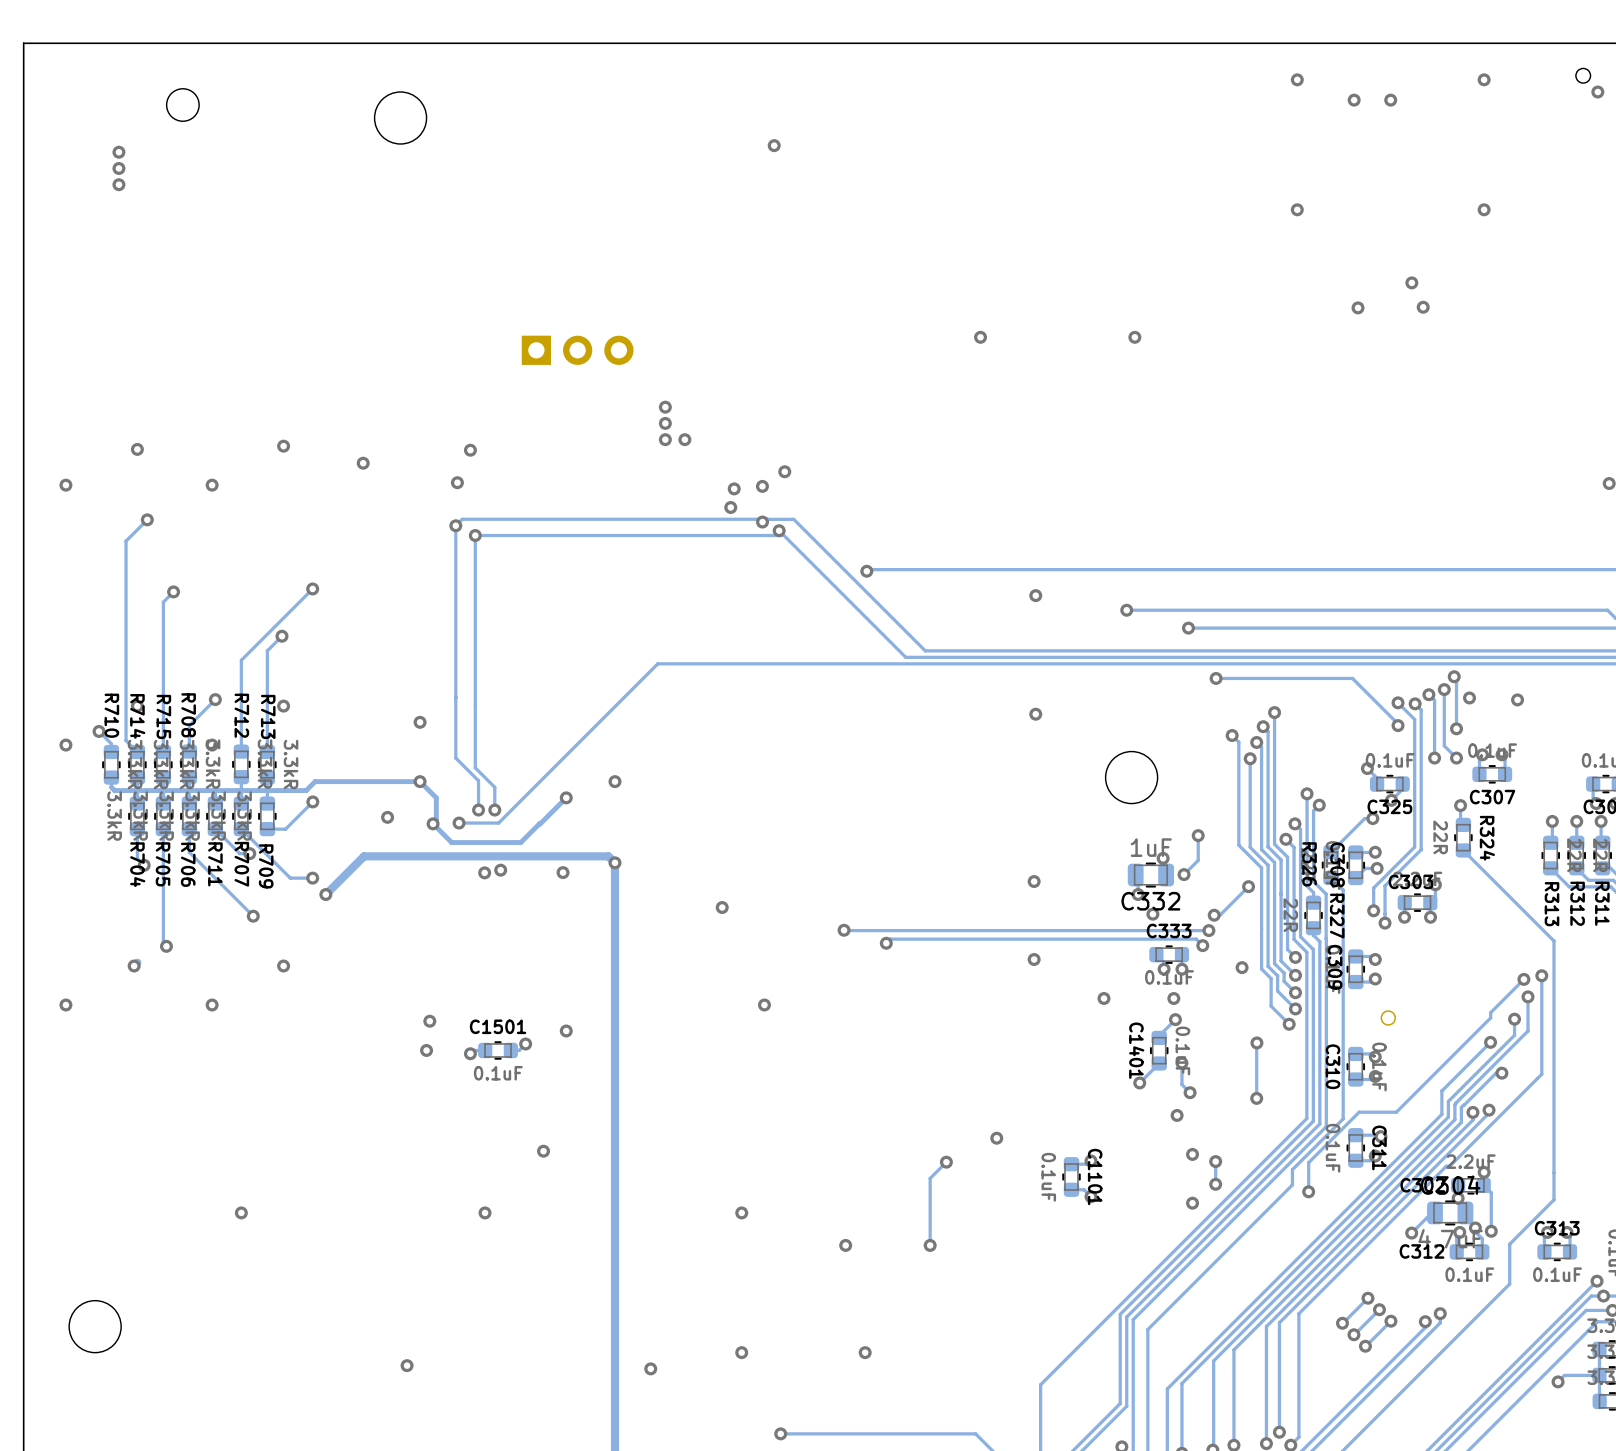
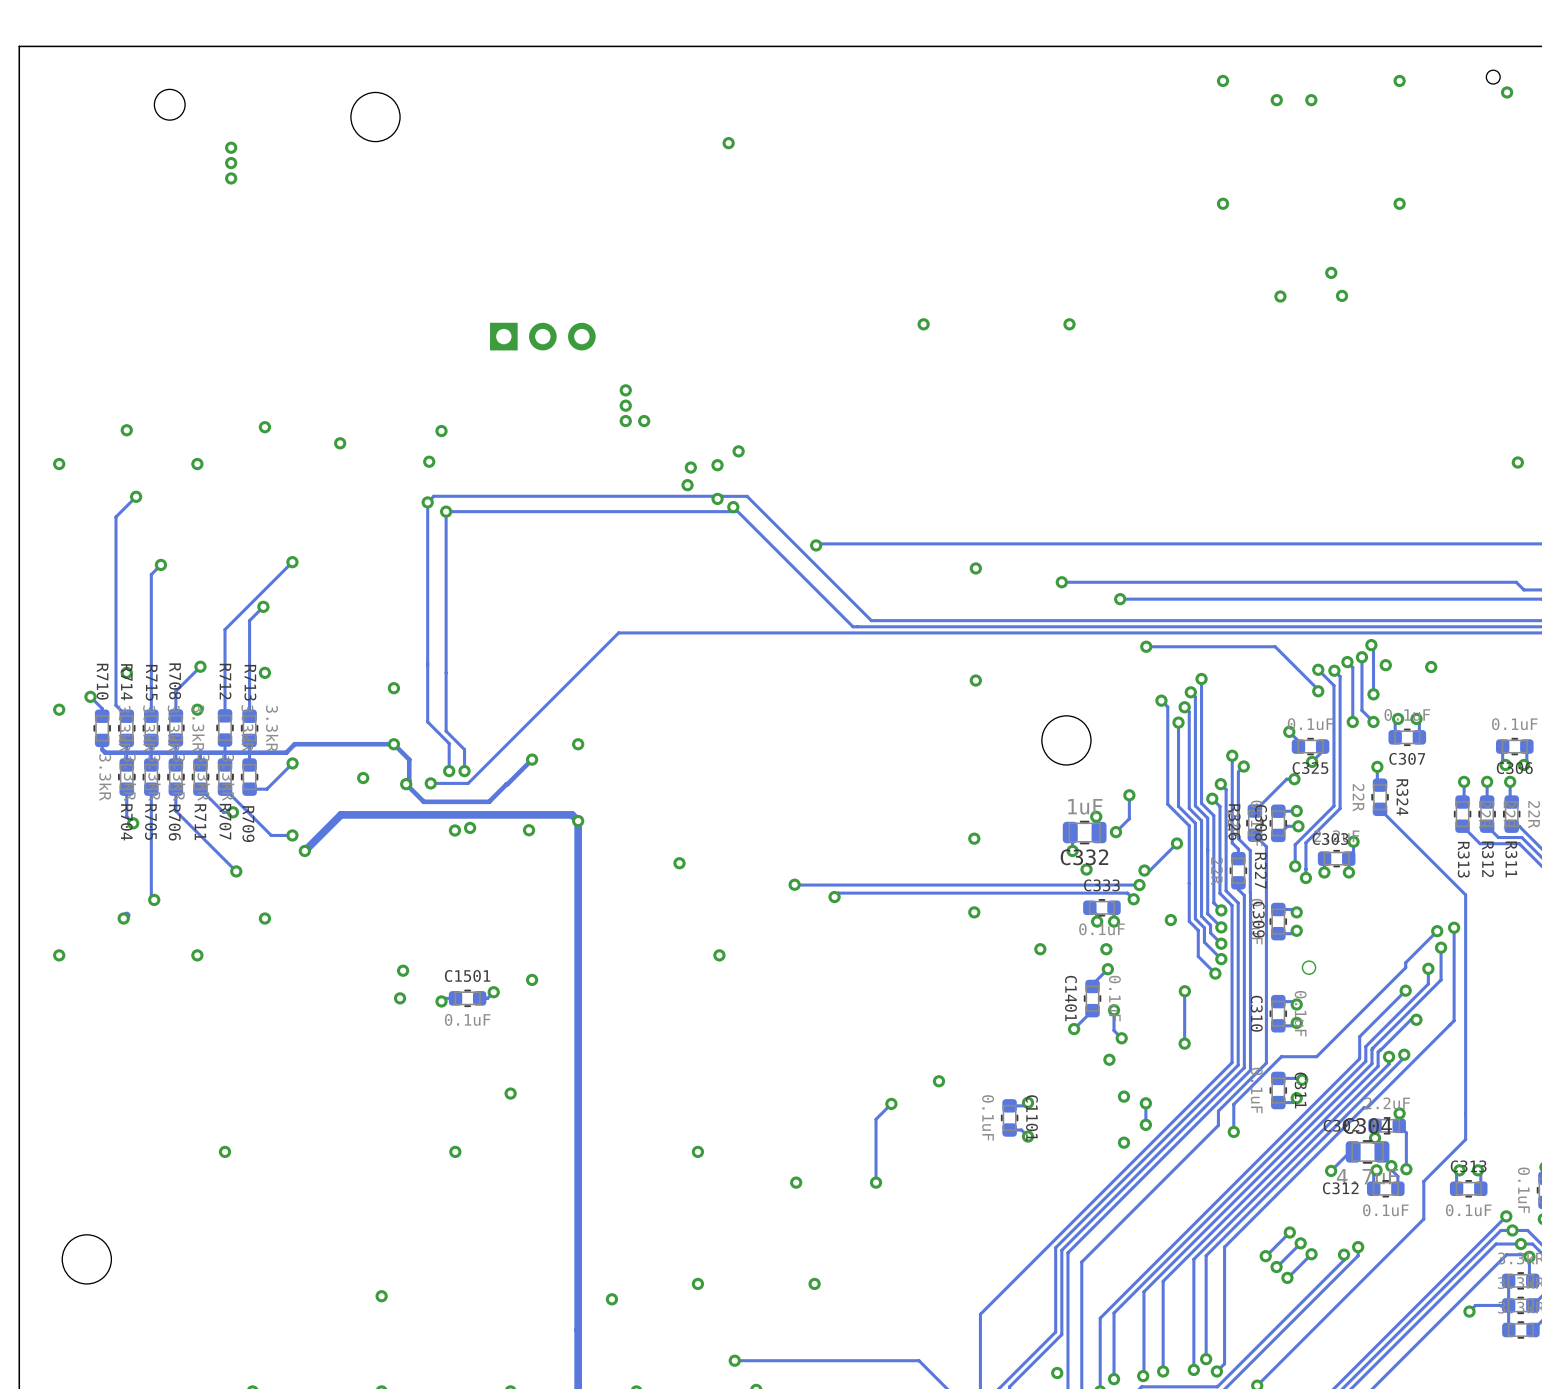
via: none -> (231, 147)
via: (118, 152) -> none
via: none -> (231, 163)
via: (118, 168) -> none
via: none -> (231, 178)
via: (118, 184) -> none

